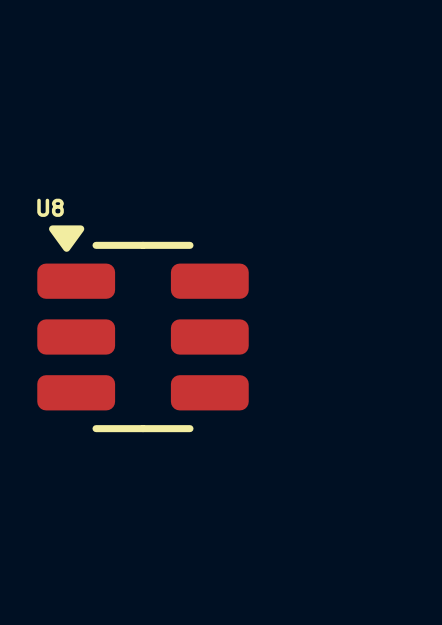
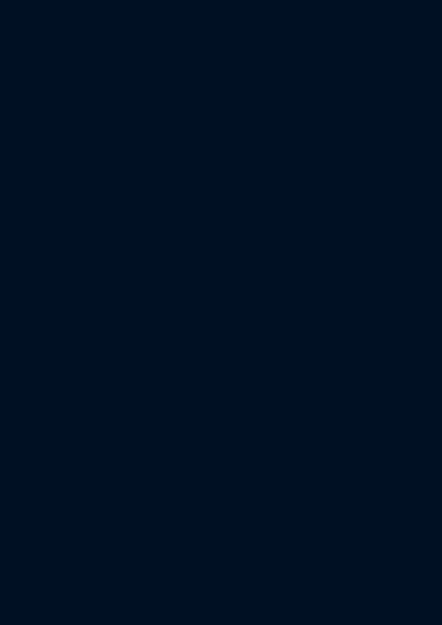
U8: (143, 328) -> none

